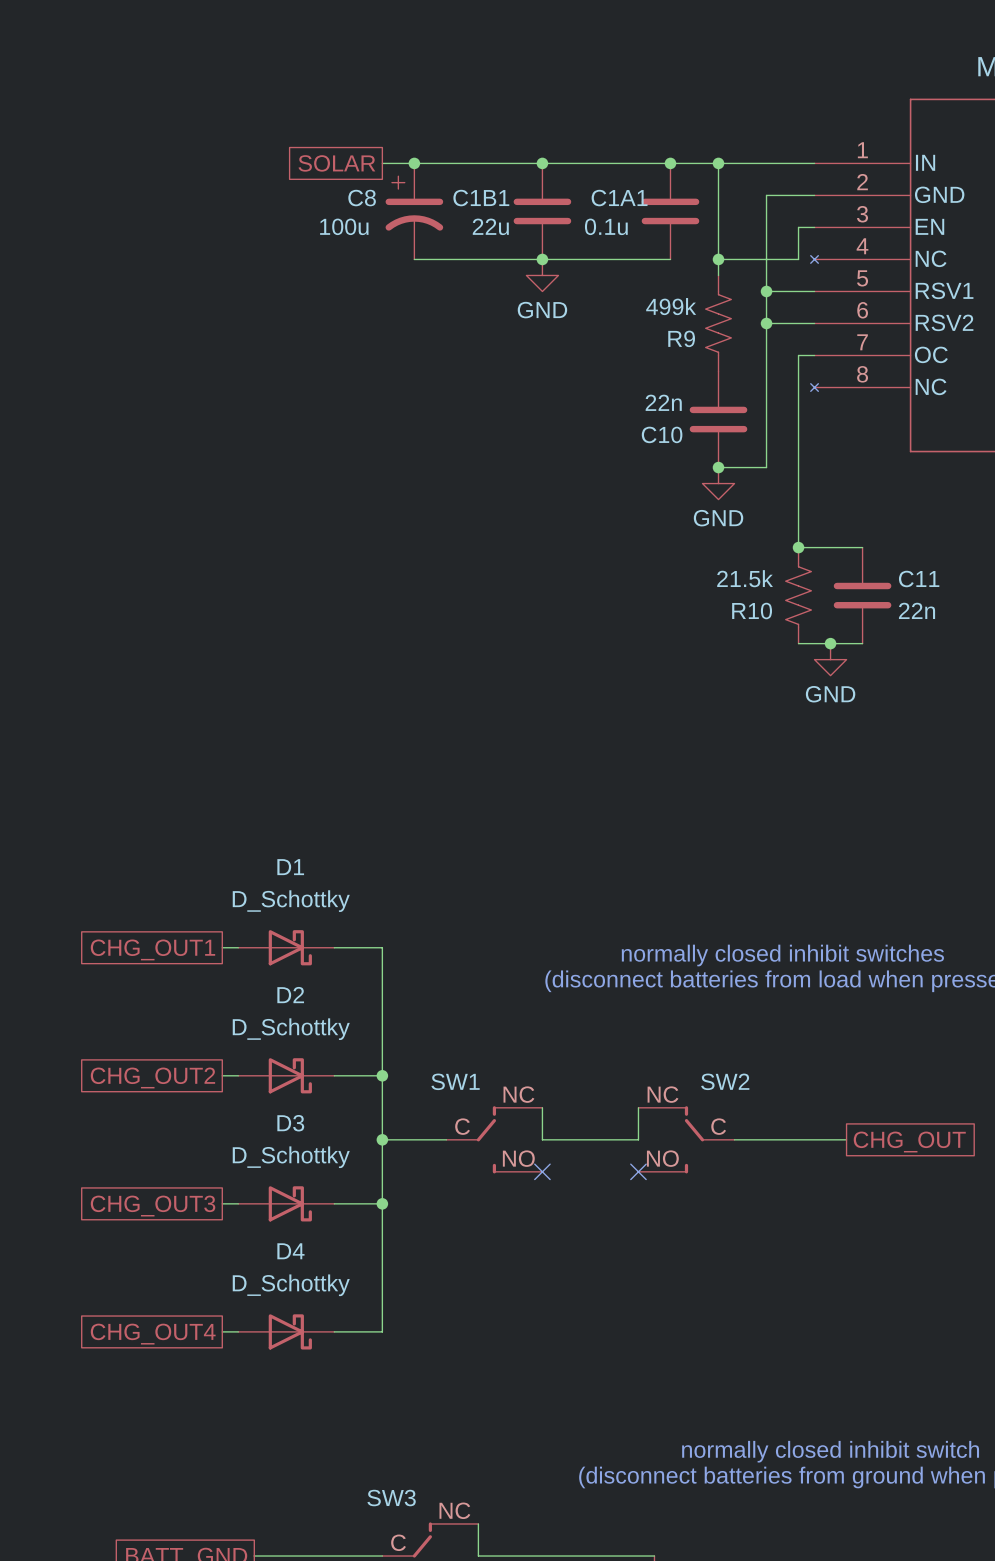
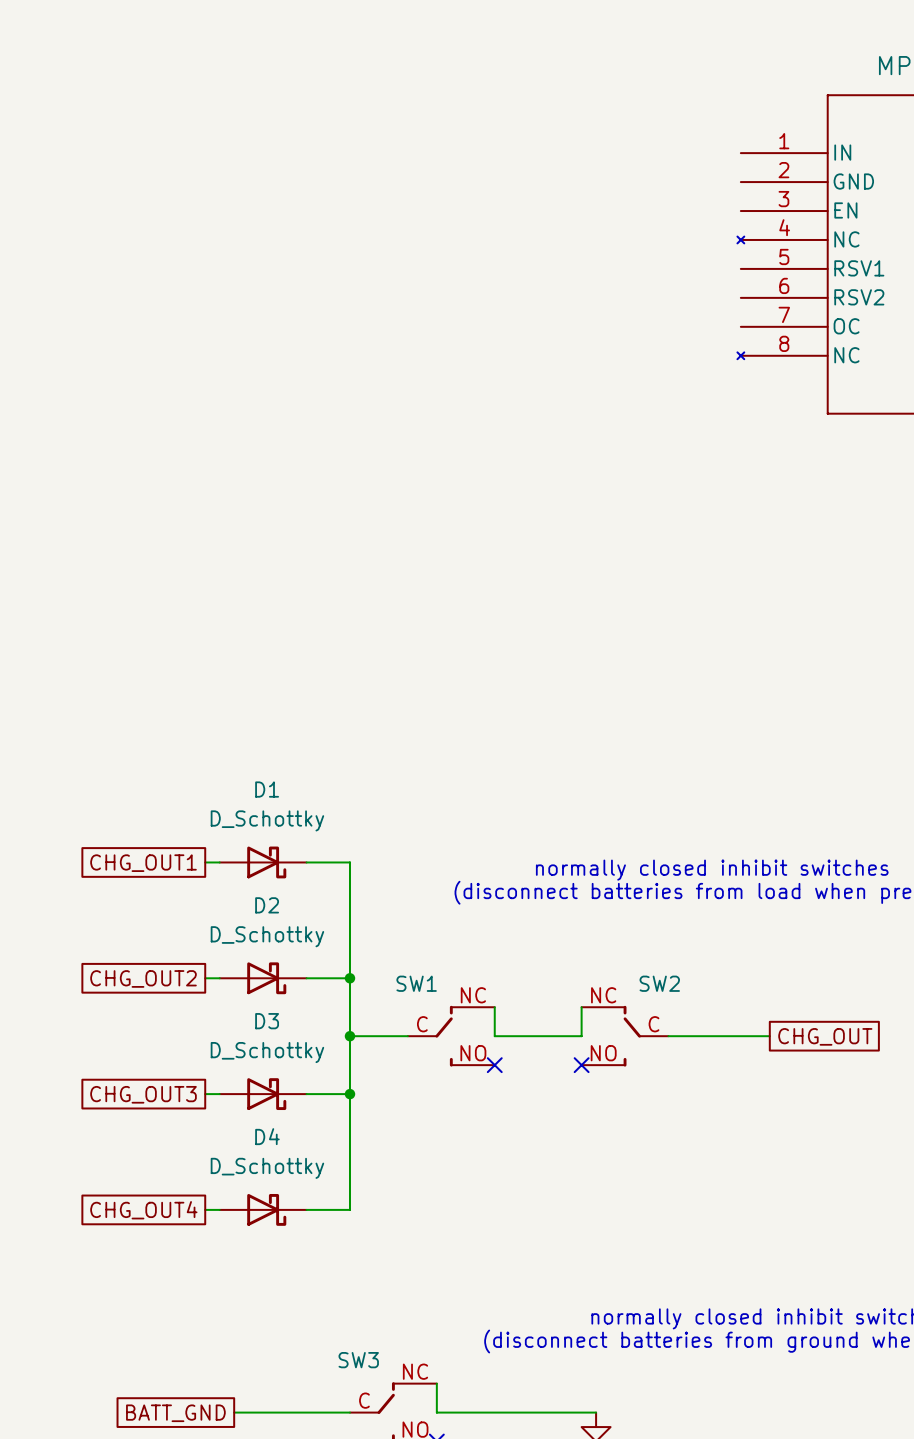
global label: SOLAR (336, 163) -> none
wire: (382, 163) (814, 163) -> none
junction: (414, 163) -> none
junction: (542, 163) -> none
junction: (670, 163) -> none
wire: (718, 163) (718, 275) -> none
junction: (718, 163) -> none
wire: (814, 195) (766, 195) (766, 467) (718, 467) -> none
C8: 100u (414, 211) -> none
C1B1: 22u (542, 211) -> none
C1A1: 0.1u (670, 211) -> none
wire: (814, 227) (798, 227) (798, 259) (718, 259) -> none
wire: (414, 259) (670, 259) -> none
junction: (542, 259) -> none
junction: (718, 259) -> none
power symbol: GND (542, 275) -> none
wire: (766, 291) (814, 291) -> none
junction: (766, 291) -> none
R9: 499k (718, 323) -> none
wire: (766, 323) (814, 323) -> none
junction: (766, 323) -> none
wire: (814, 355) (798, 355) (798, 547) (862, 547) -> none
C10: 22n (718, 419) -> none
junction: (718, 467) -> none
power symbol: GND (718, 483) -> none
junction: (798, 547) -> none
R10: 21.5k (798, 595) -> none
C11: 22n (862, 595) -> none
wire: (798, 643) (862, 643) -> none
junction: (830, 643) -> none
power symbol: GND (830, 659) -> none

